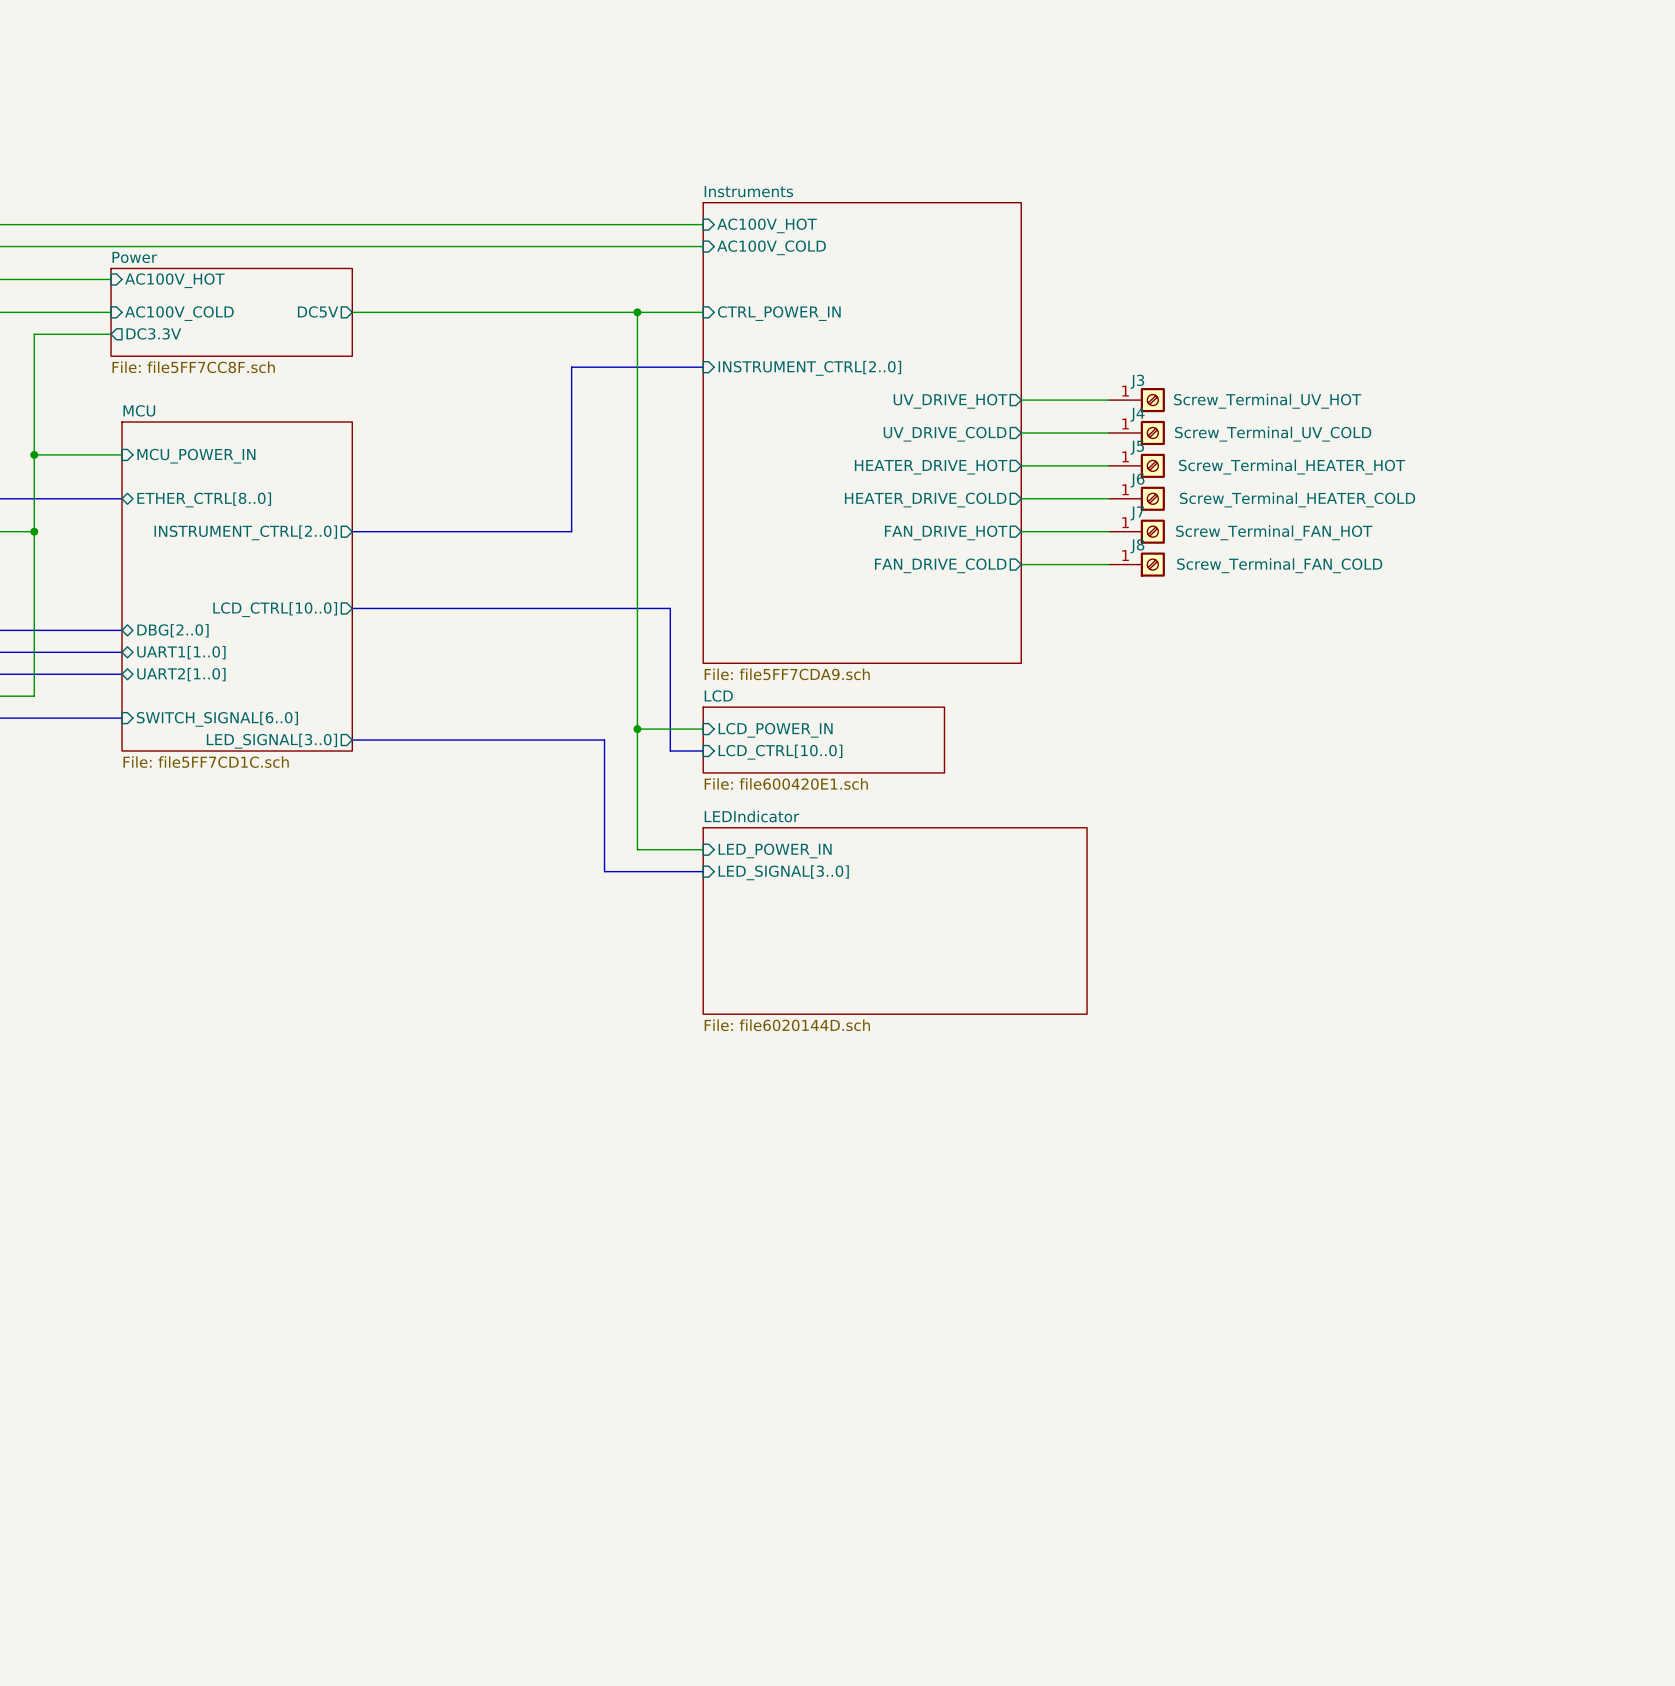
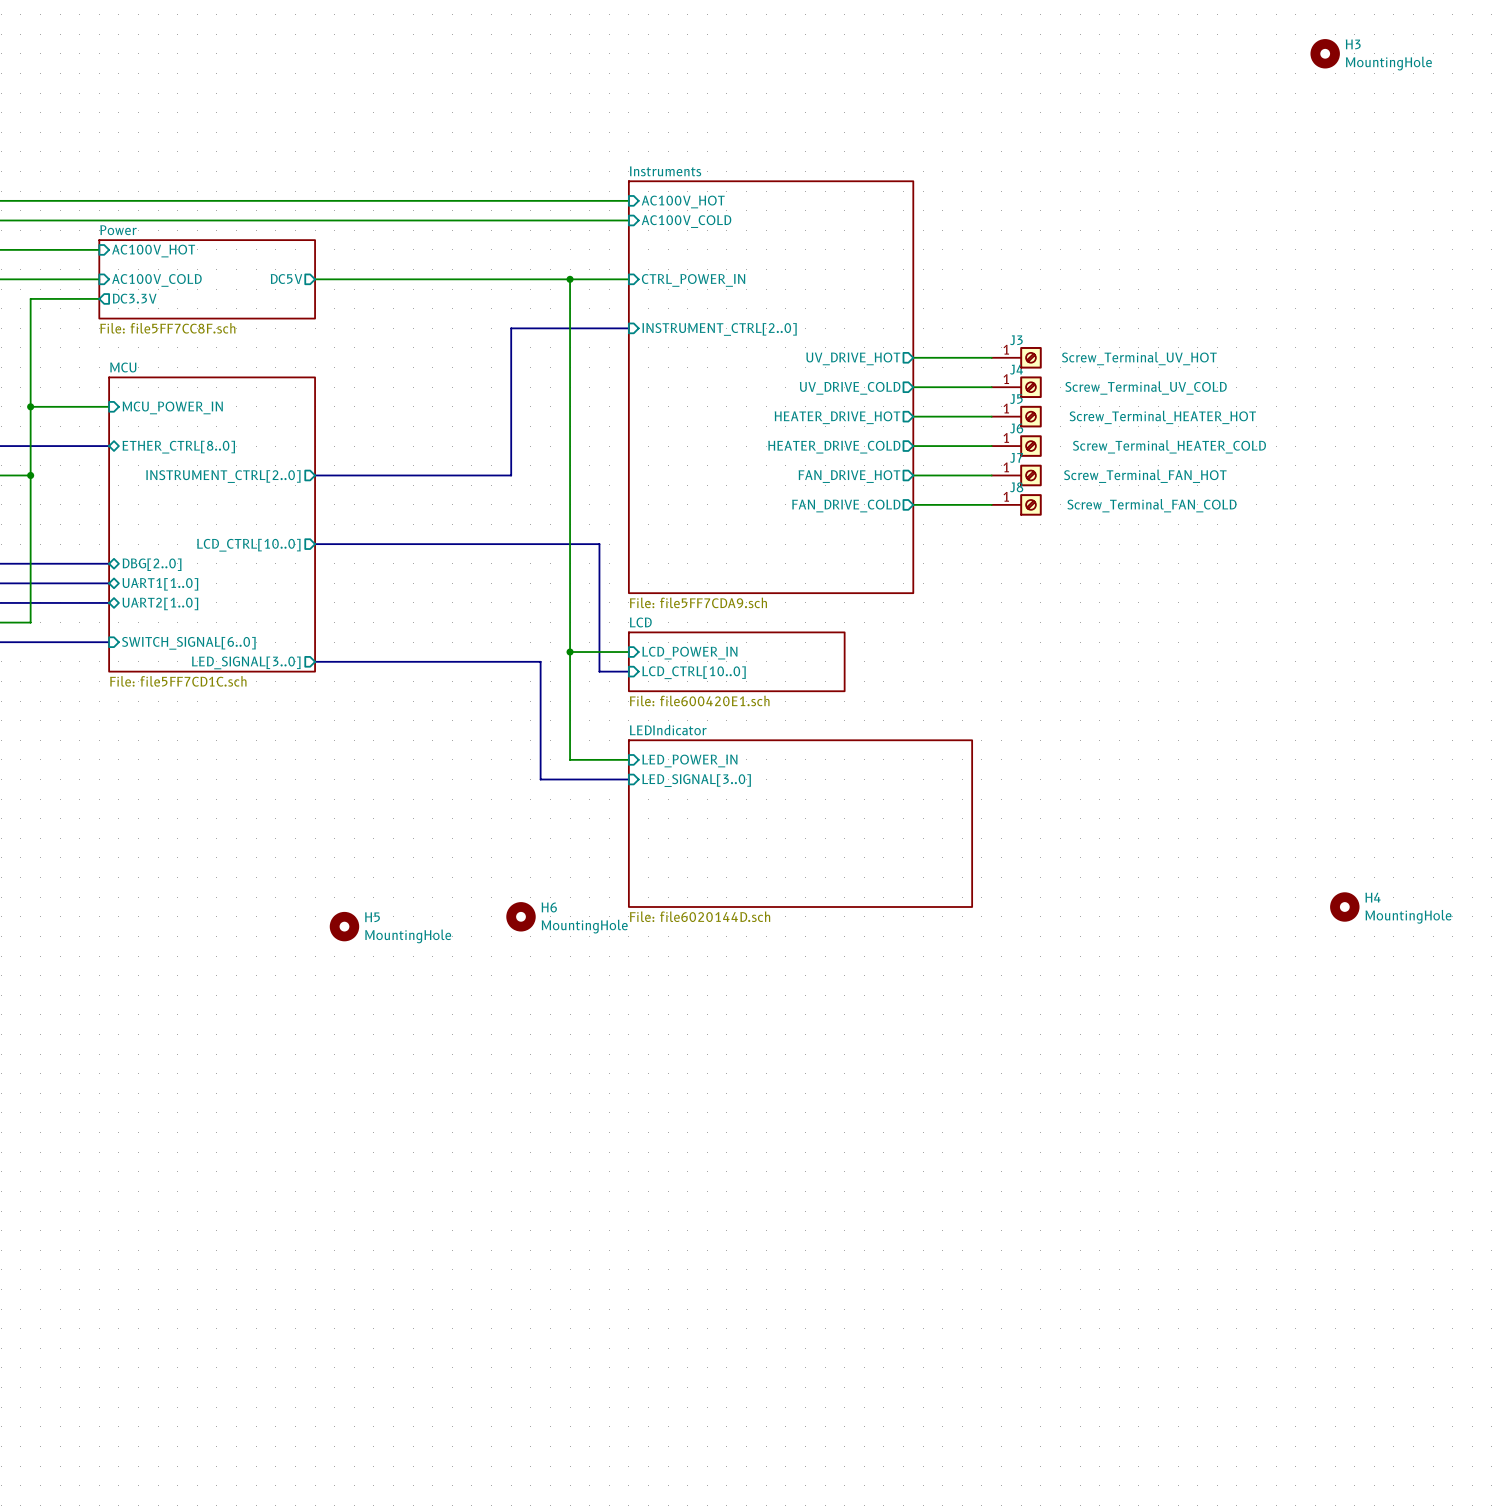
H3: none -> MountingHole (1325, 53)
H4: none -> MountingHole (1344, 906)
H6: none -> MountingHole (521, 916)
H5: none -> MountingHole (344, 926)

